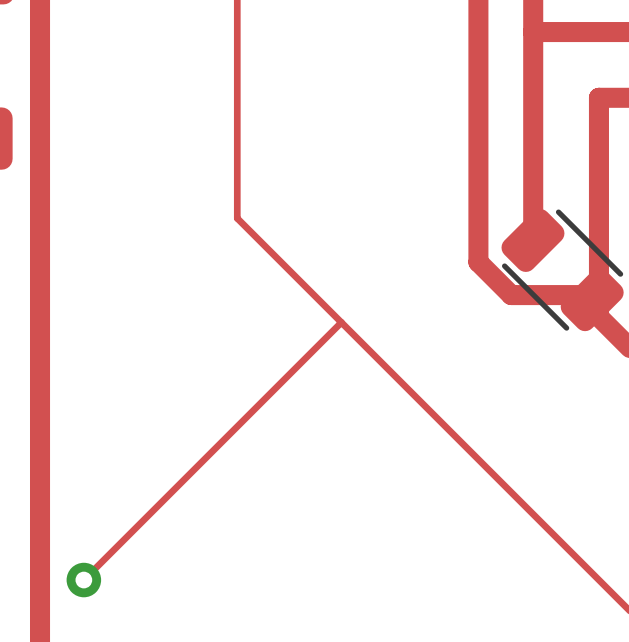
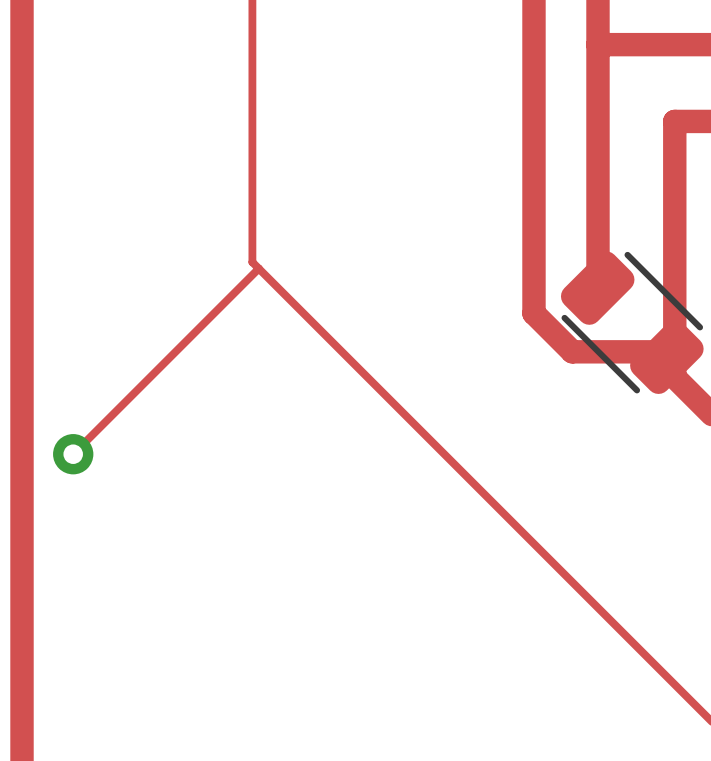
track: none -> (258, 268) (73, 454)
track: (341, 322) (83, 580) -> none
via position: (83, 580) -> (73, 454)

